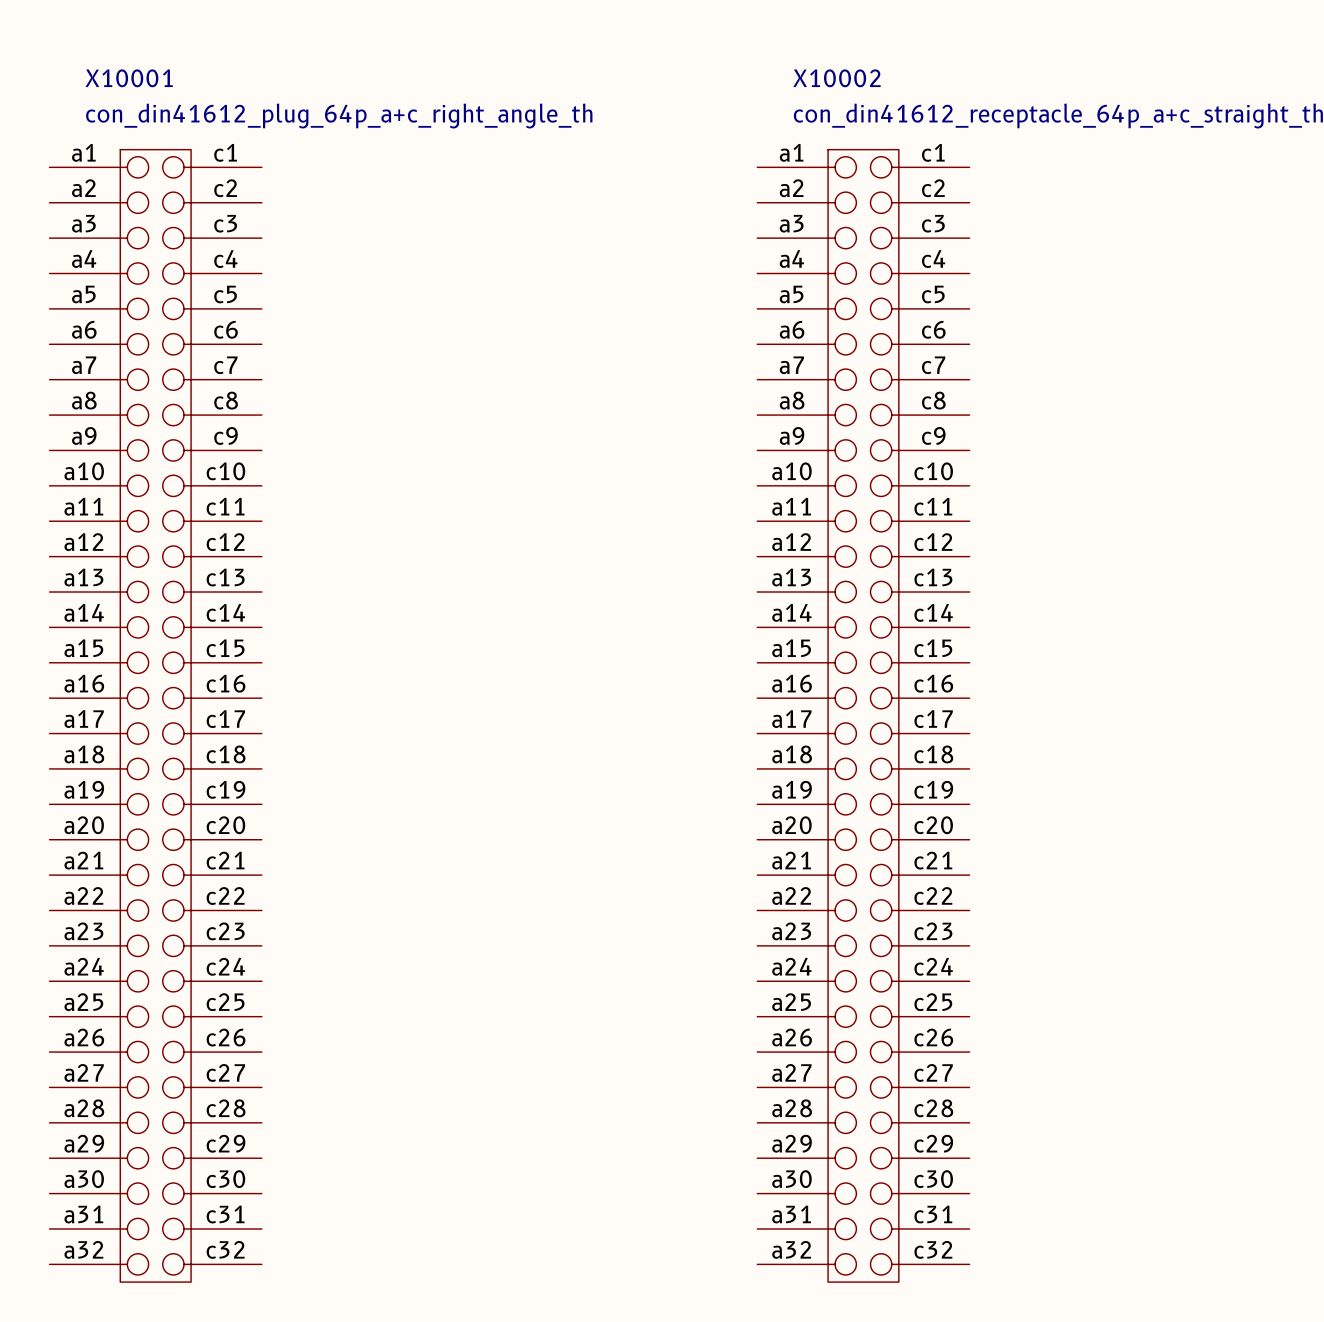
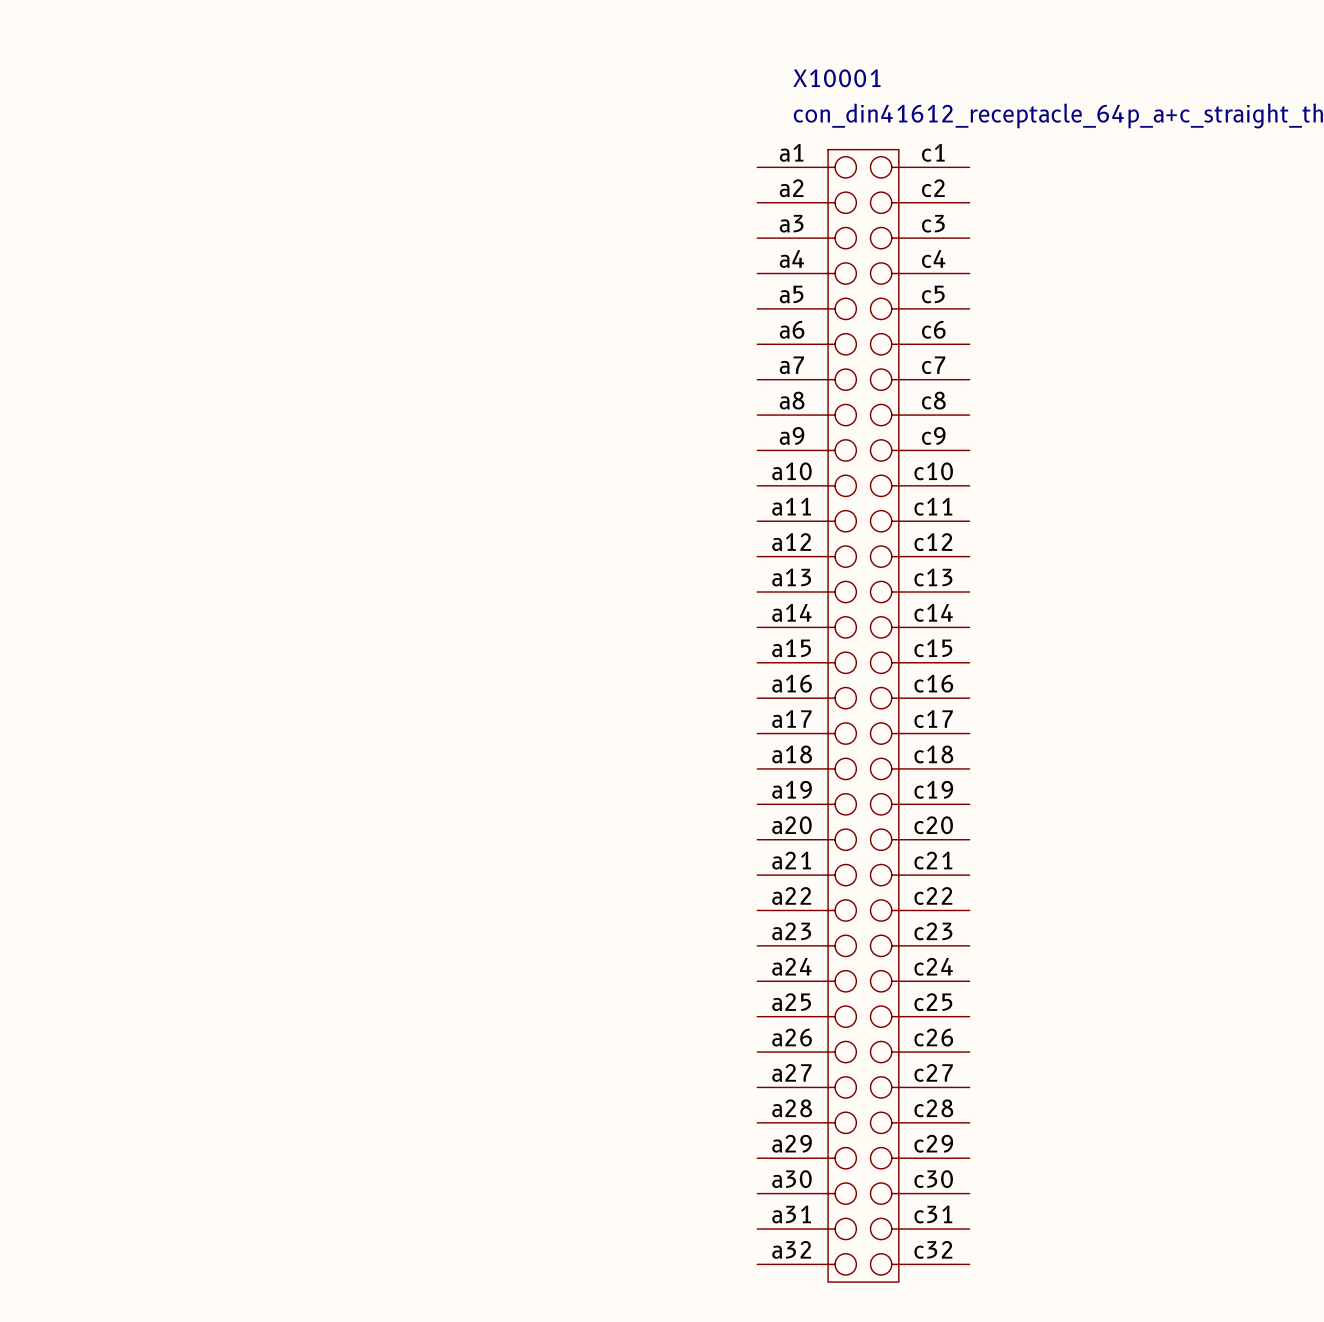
X10002 name: X10002 (836, 78) -> X10001 (836, 78)
X10001: con_din41612_plug_64p_a+c_right_angle_th (155, 715) -> none

